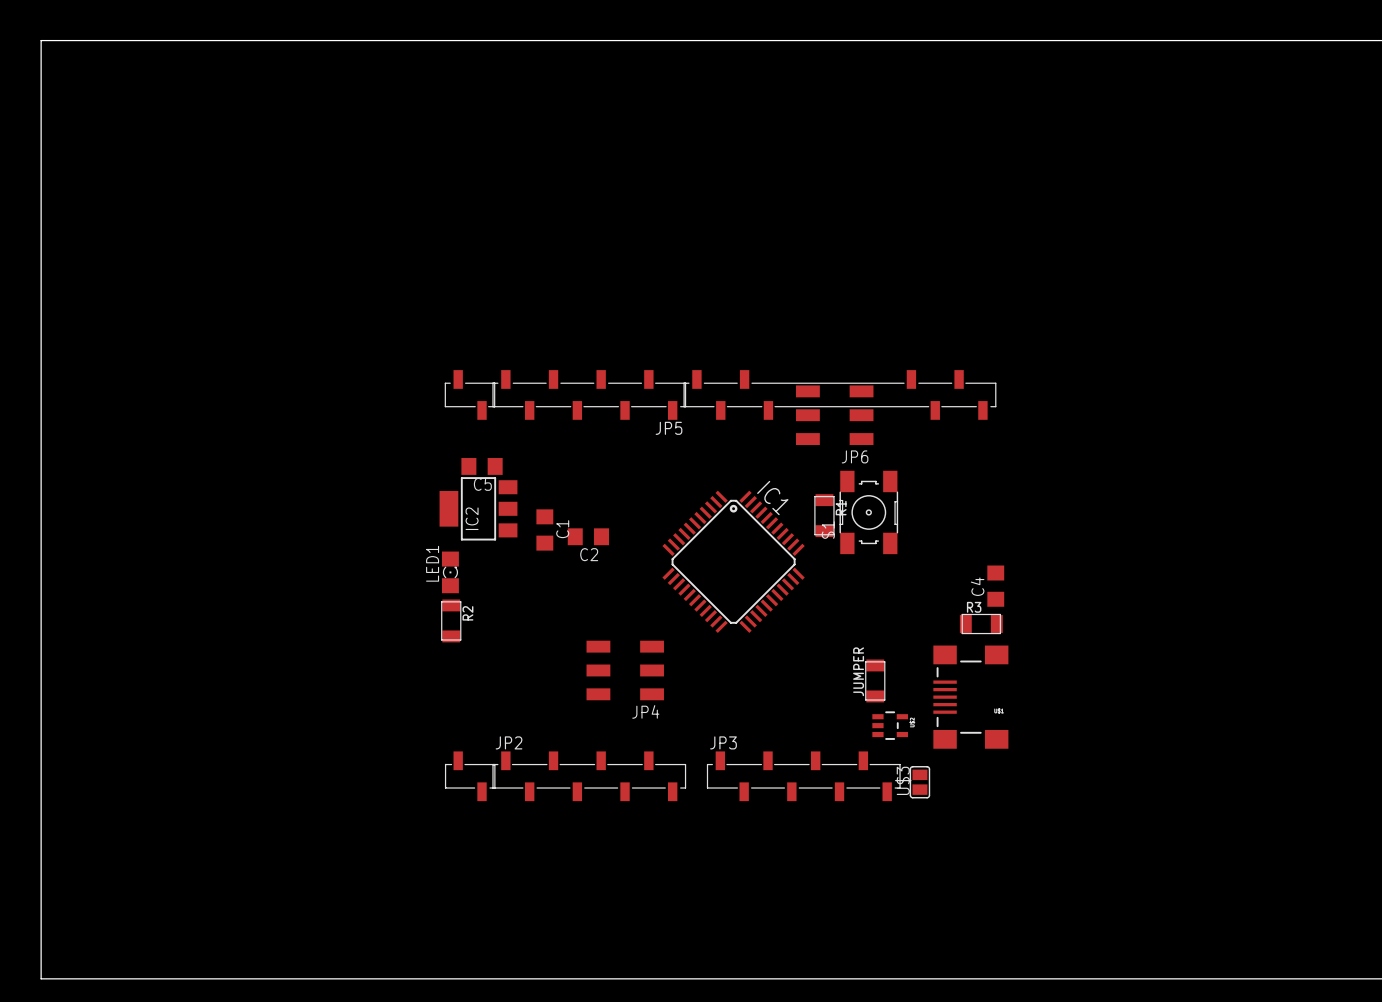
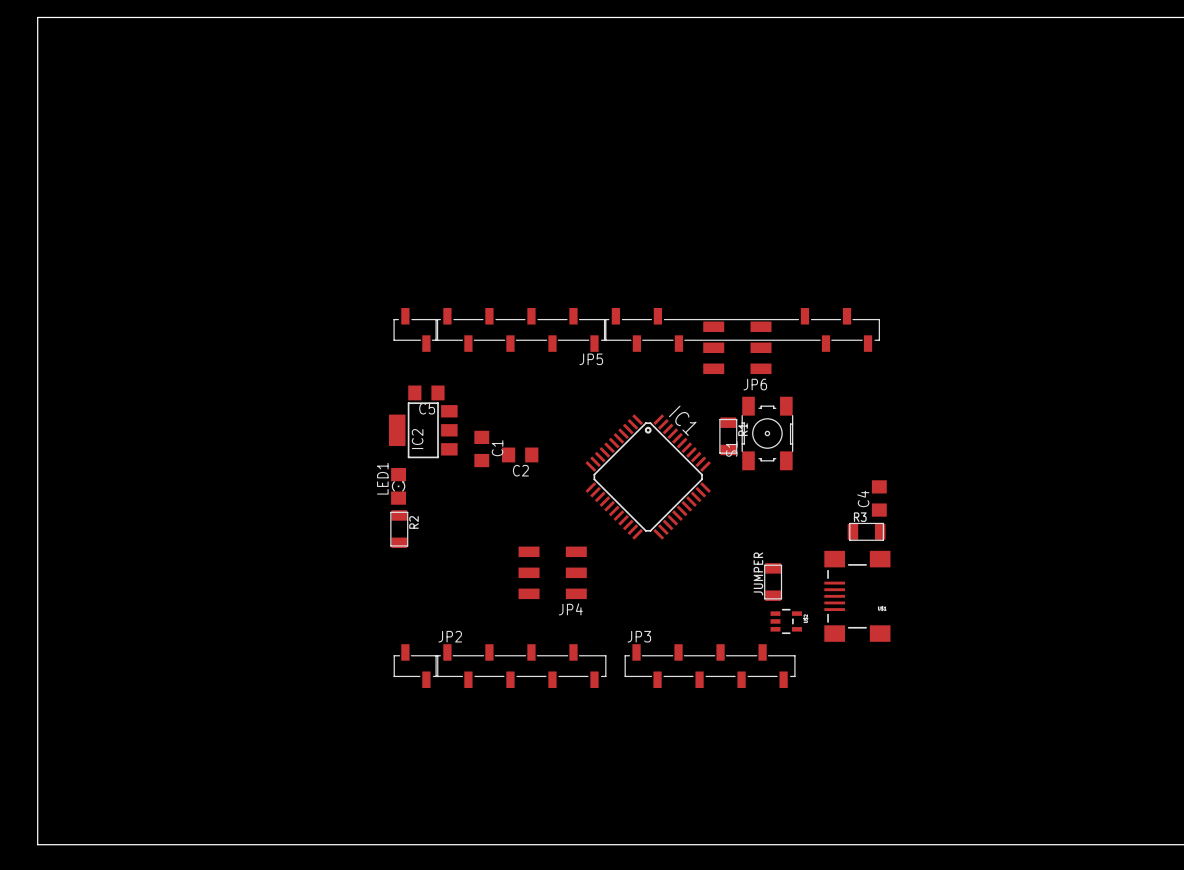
U$3: (919, 782) -> none

